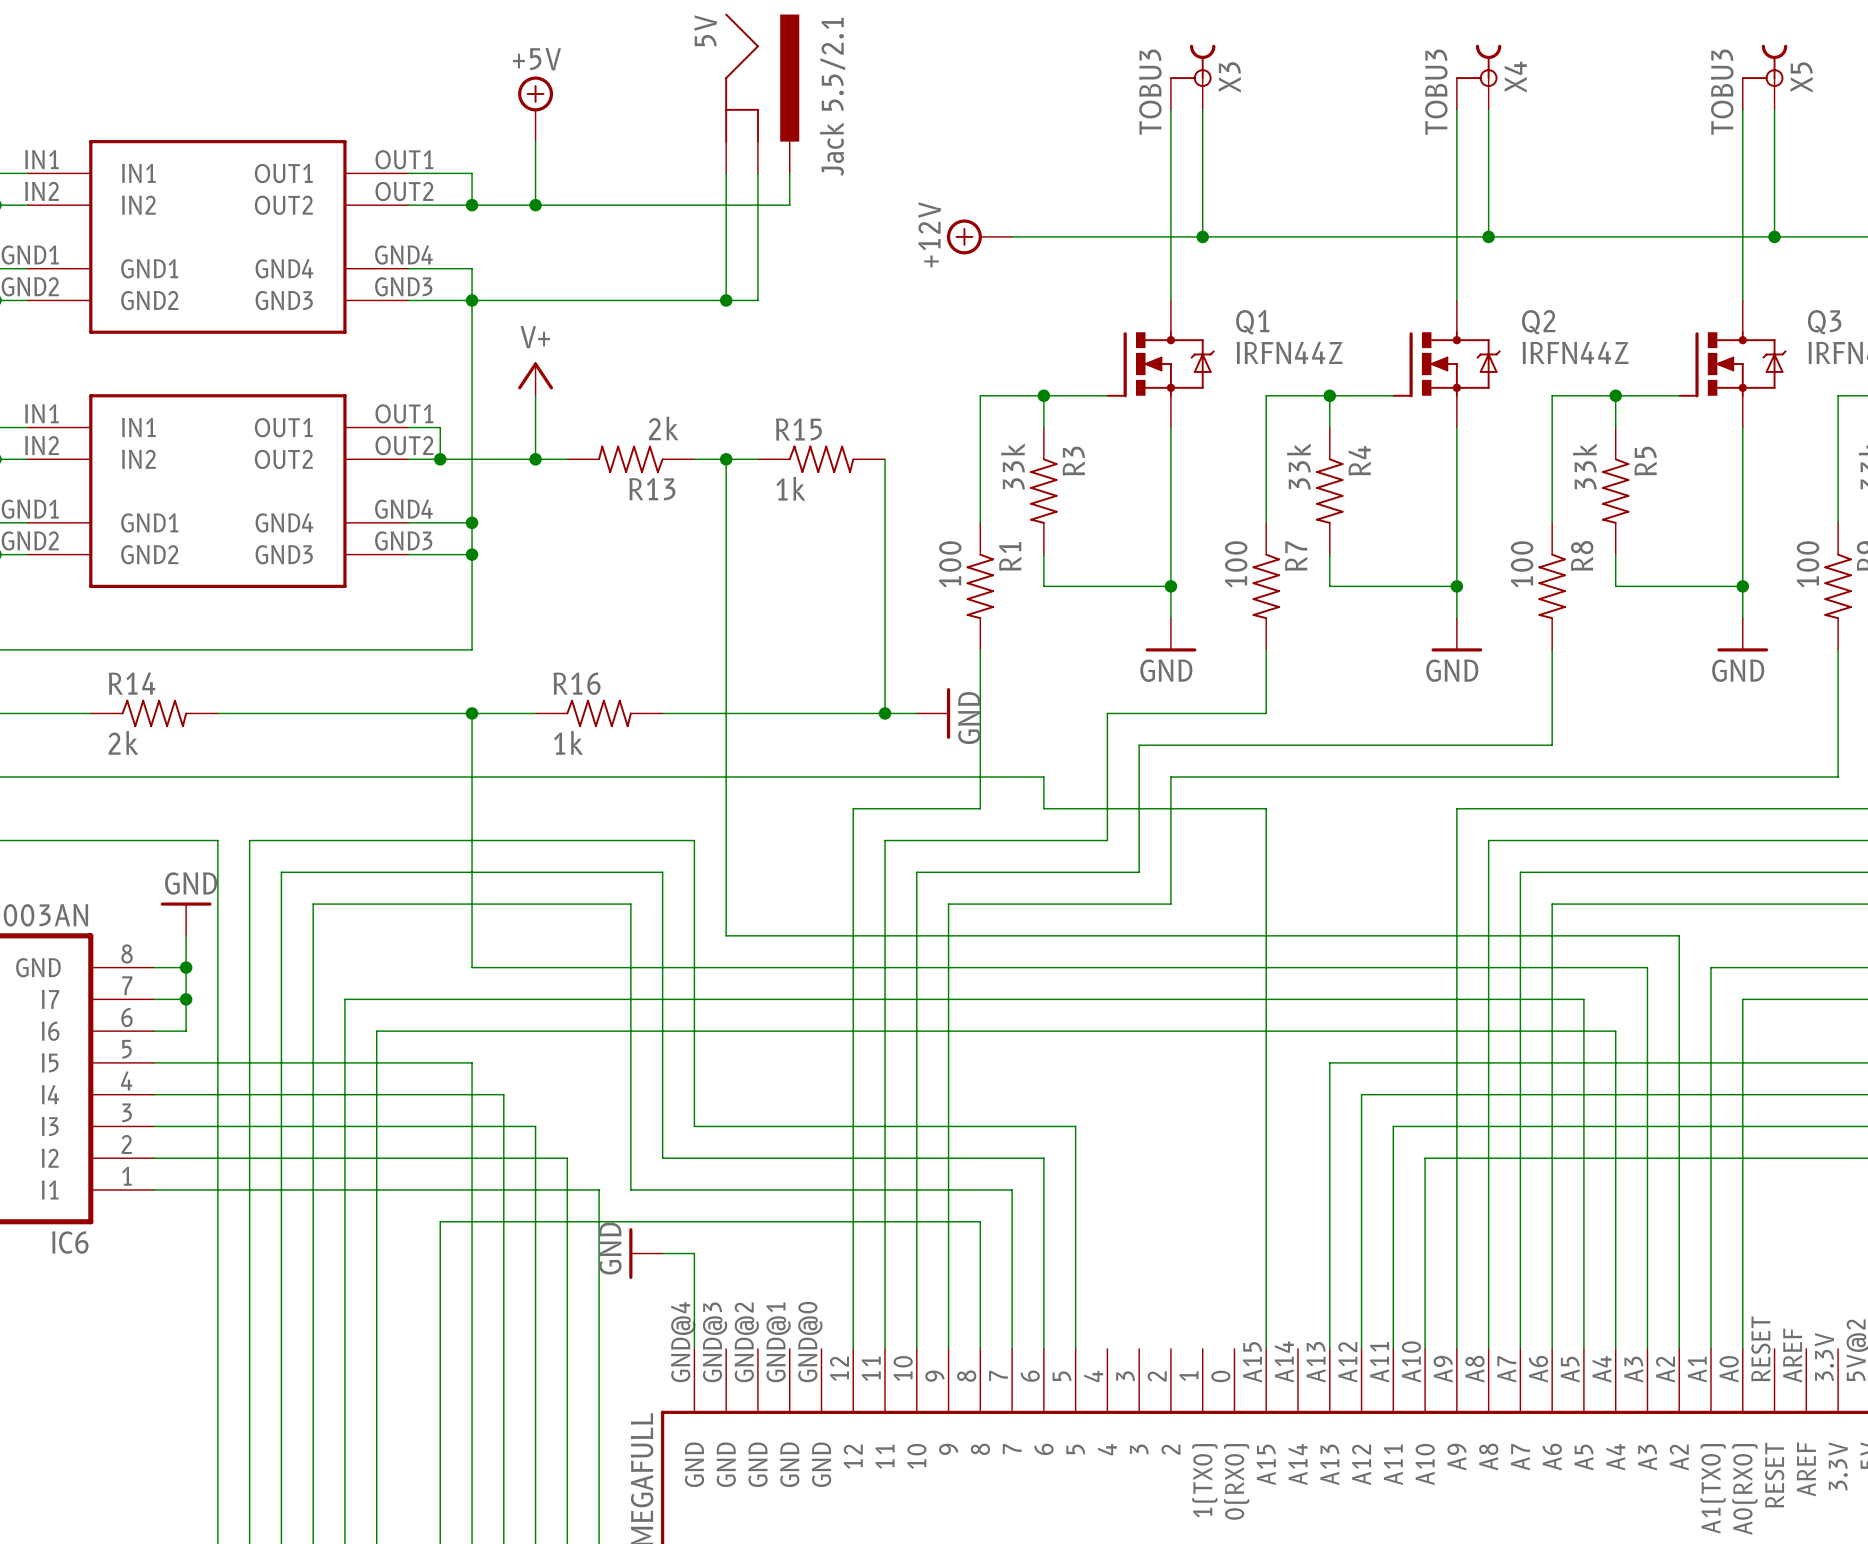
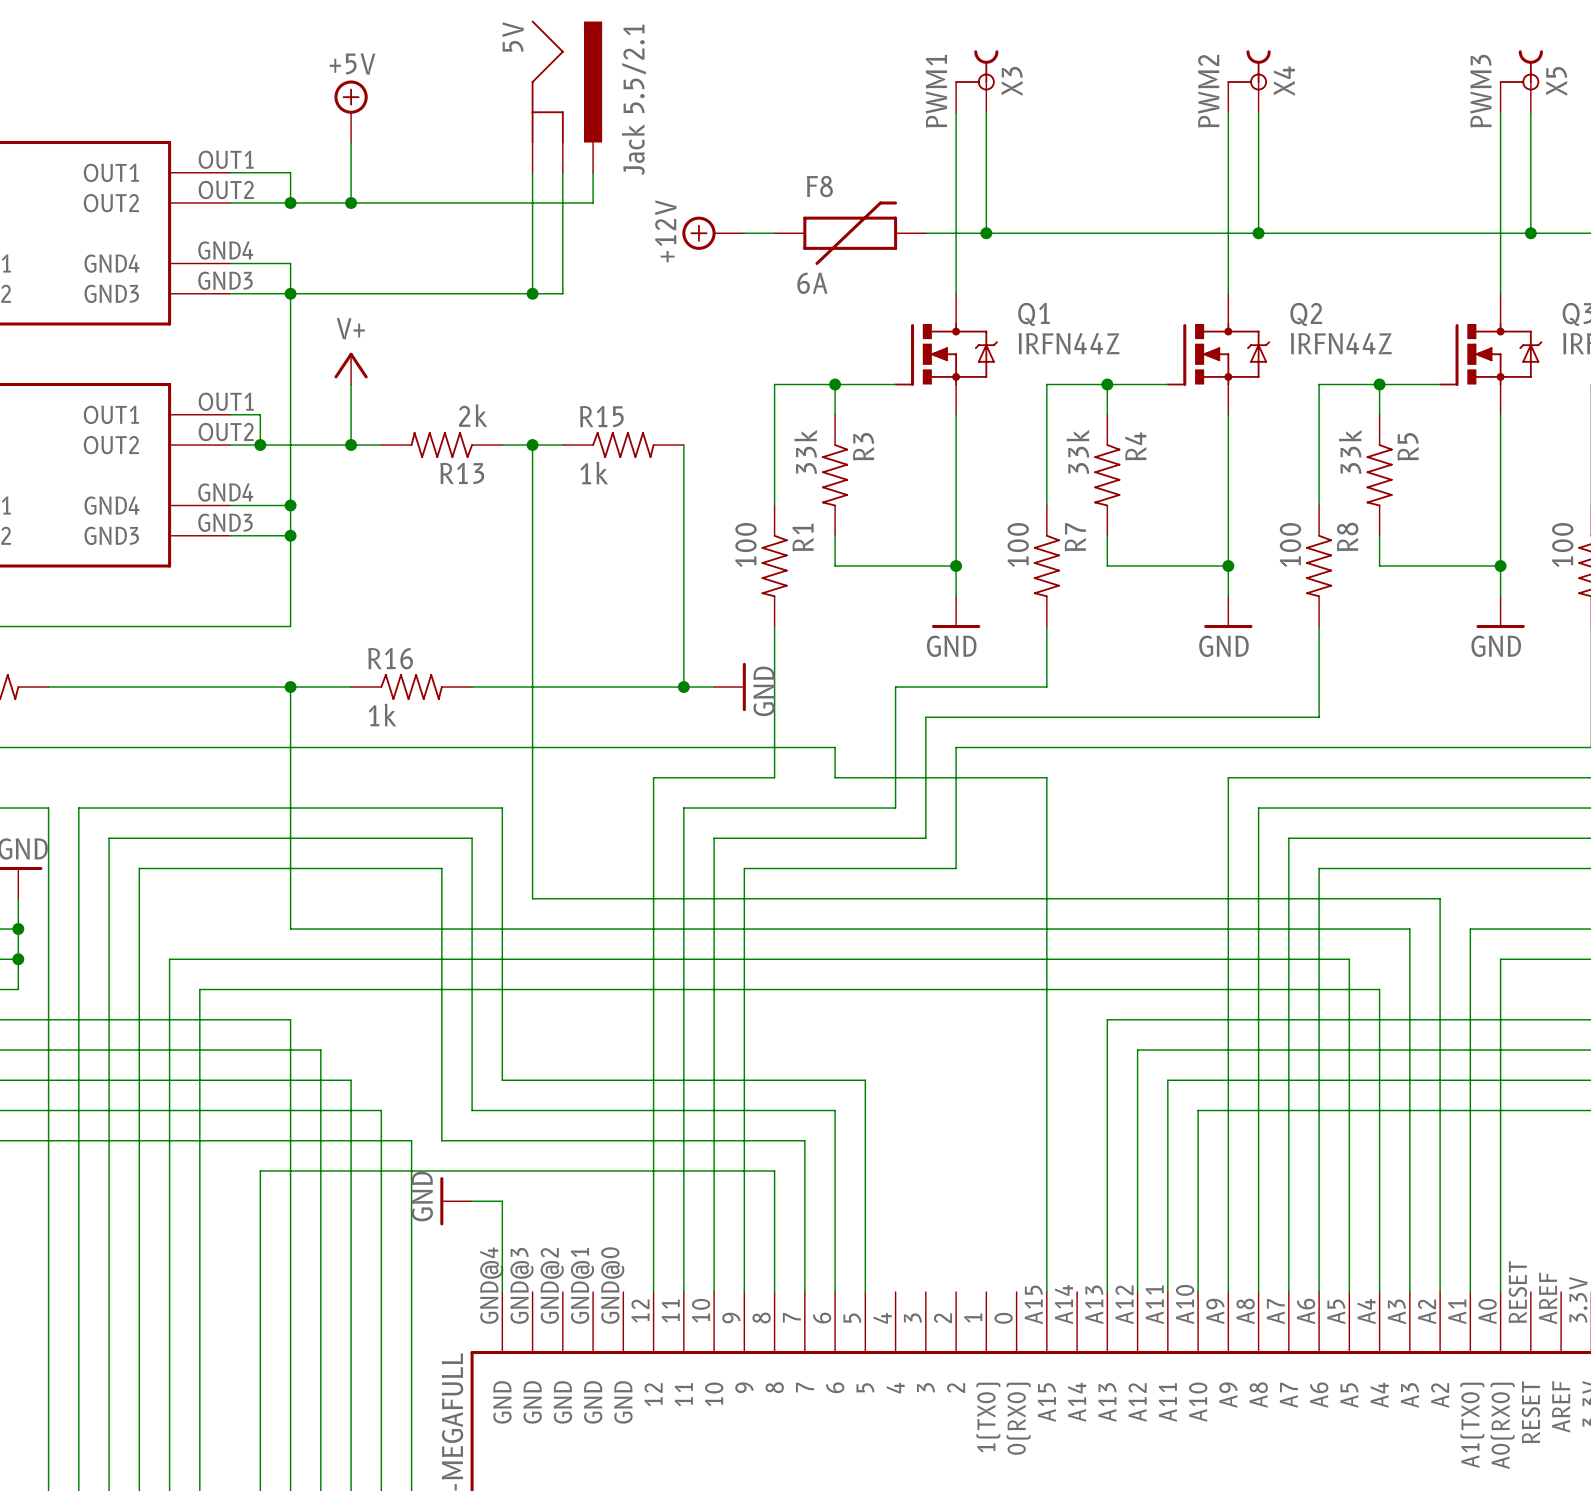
X3 value: TOBU3 (1150, 92) -> PWM1 (936, 91)
X4 value: TOBU3 (1436, 92) -> PWM2 (1208, 91)
X5 value: TOBU3 (1722, 92) -> PWM3 (1480, 91)
power symbol position: +12V (979, 236) -> +12V (713, 233)
wire: (1012, 236) (1139, 236) -> none
F8: none -> 6A (850, 233)

